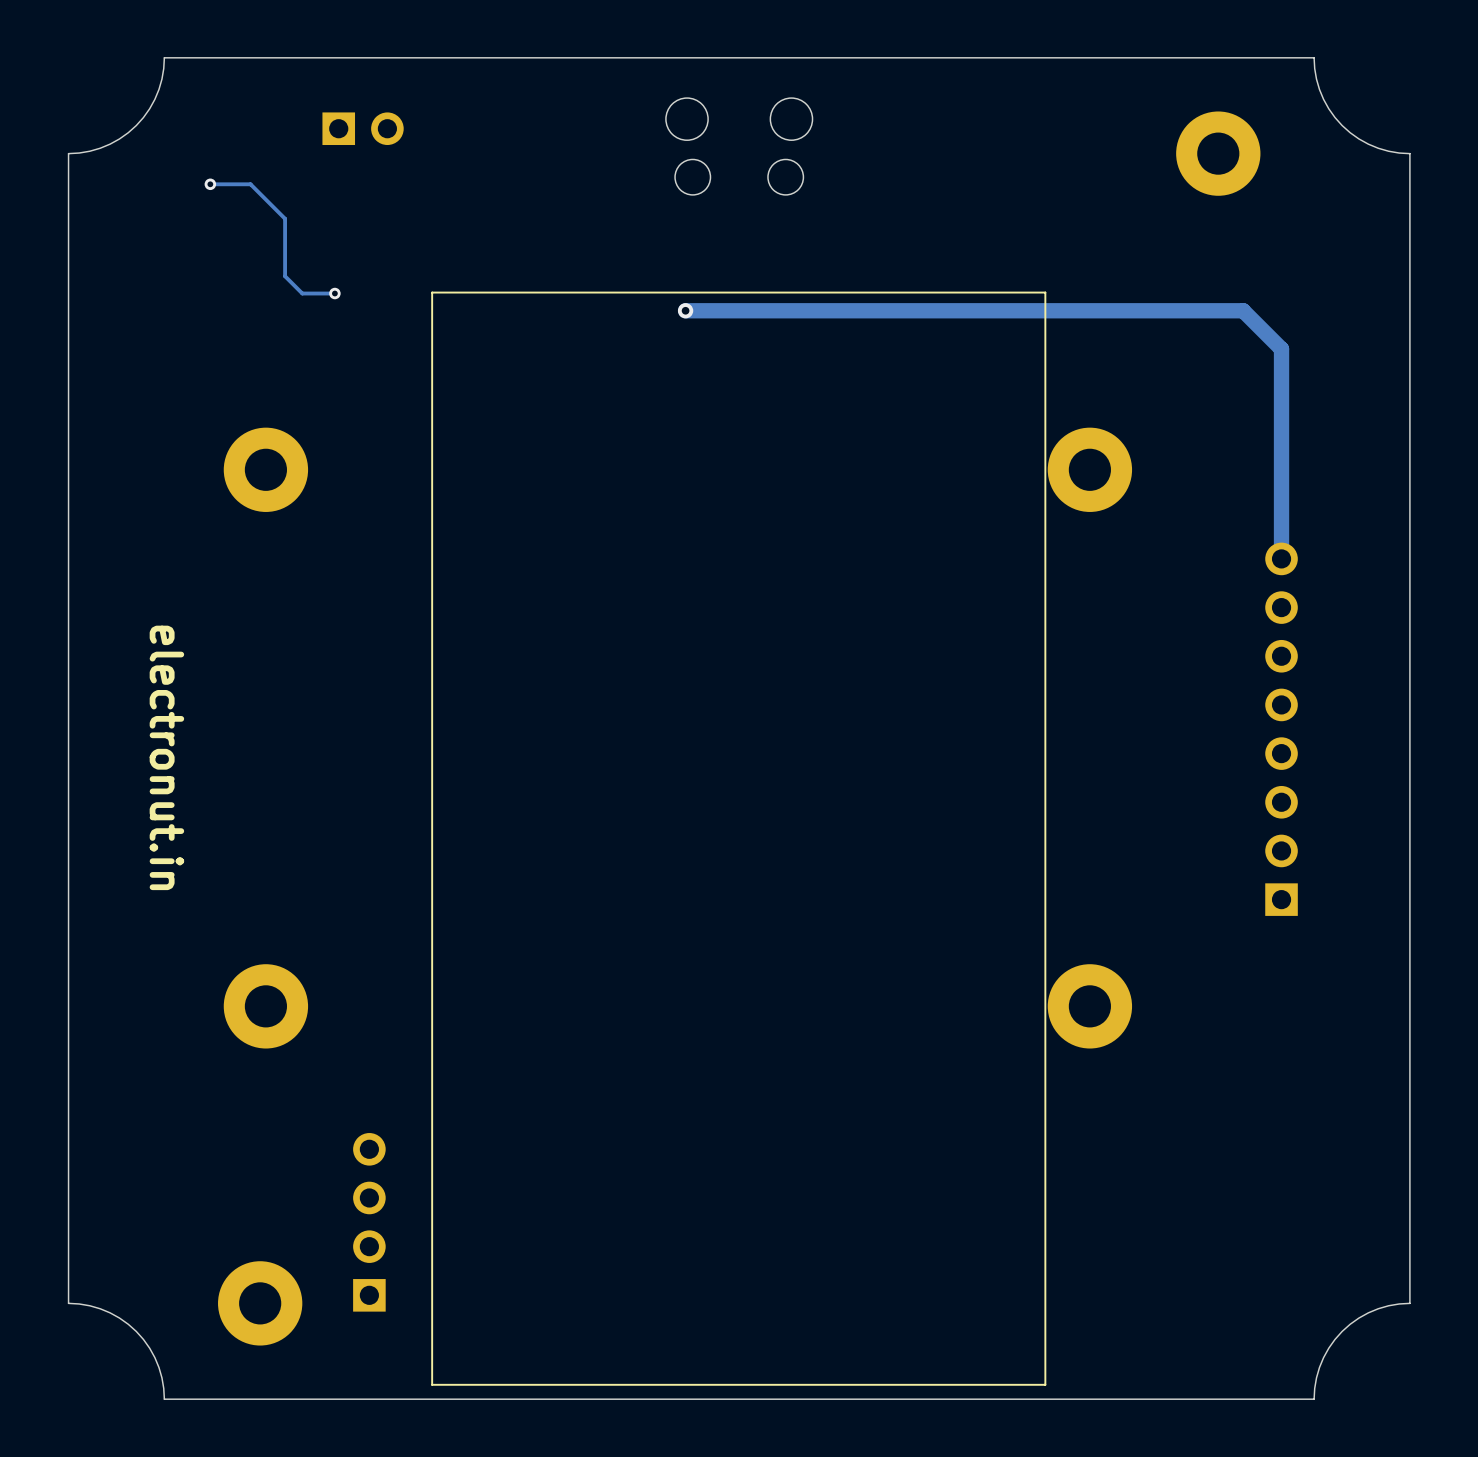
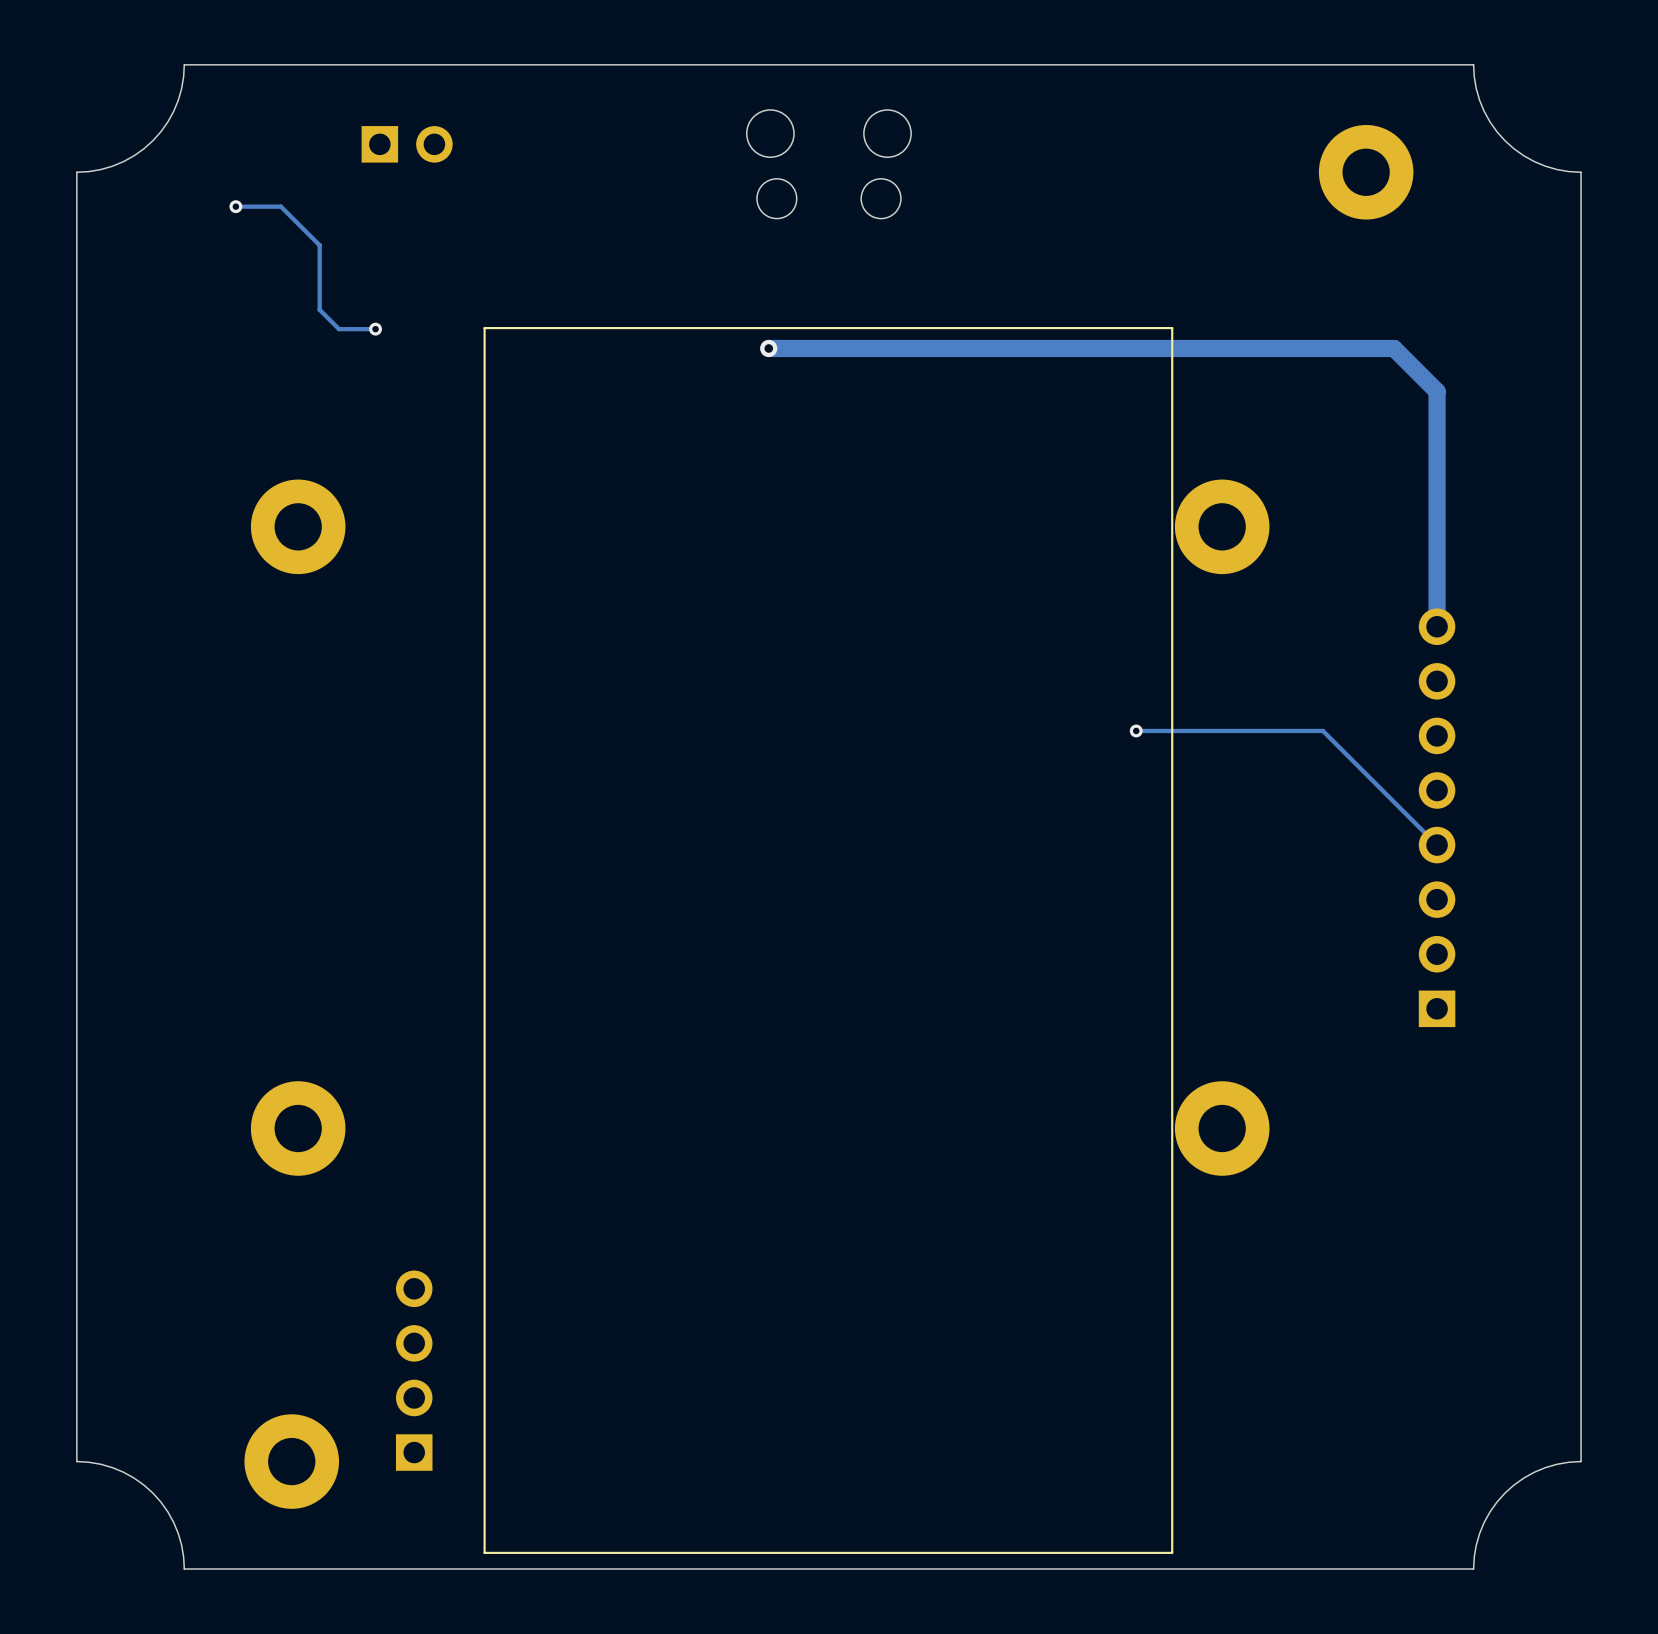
track: none -> (1136, 730) (1322, 730) (1437, 845)
via: none -> (1136, 730)
text: electronut.in (166, 757) -> none

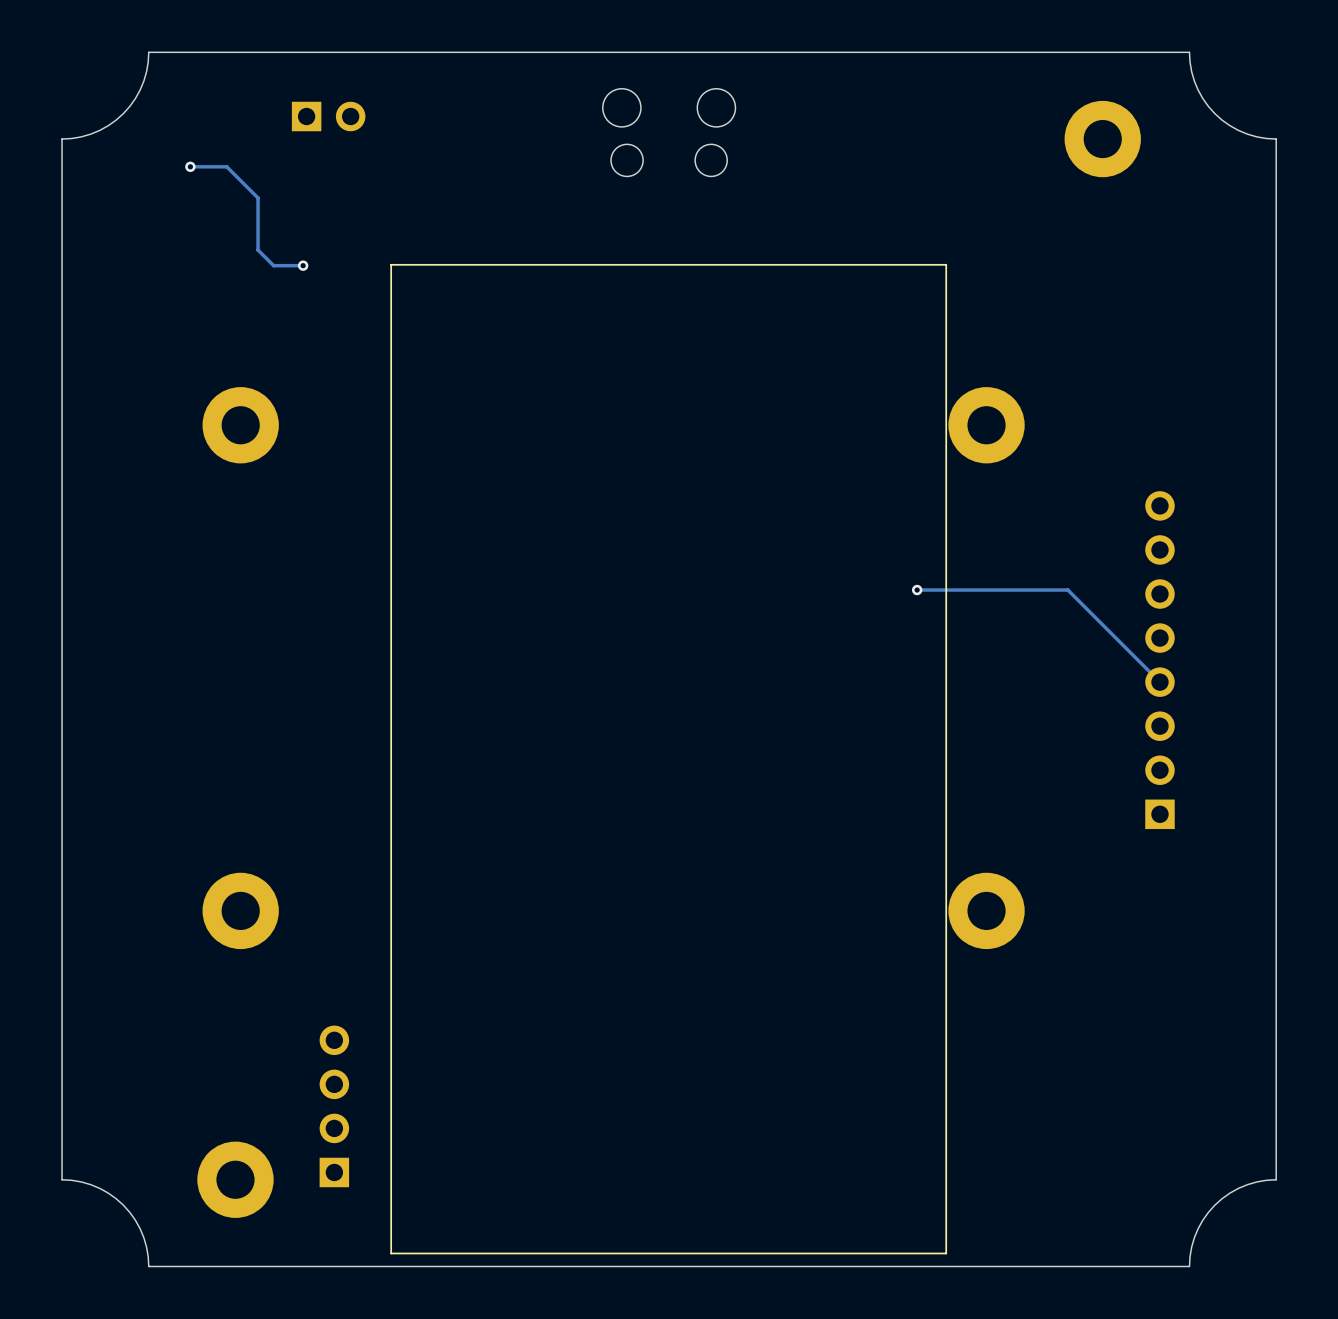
track: (768, 348) (1394, 348) (1437, 391) (1437, 626) -> none
via: (768, 348) -> none

